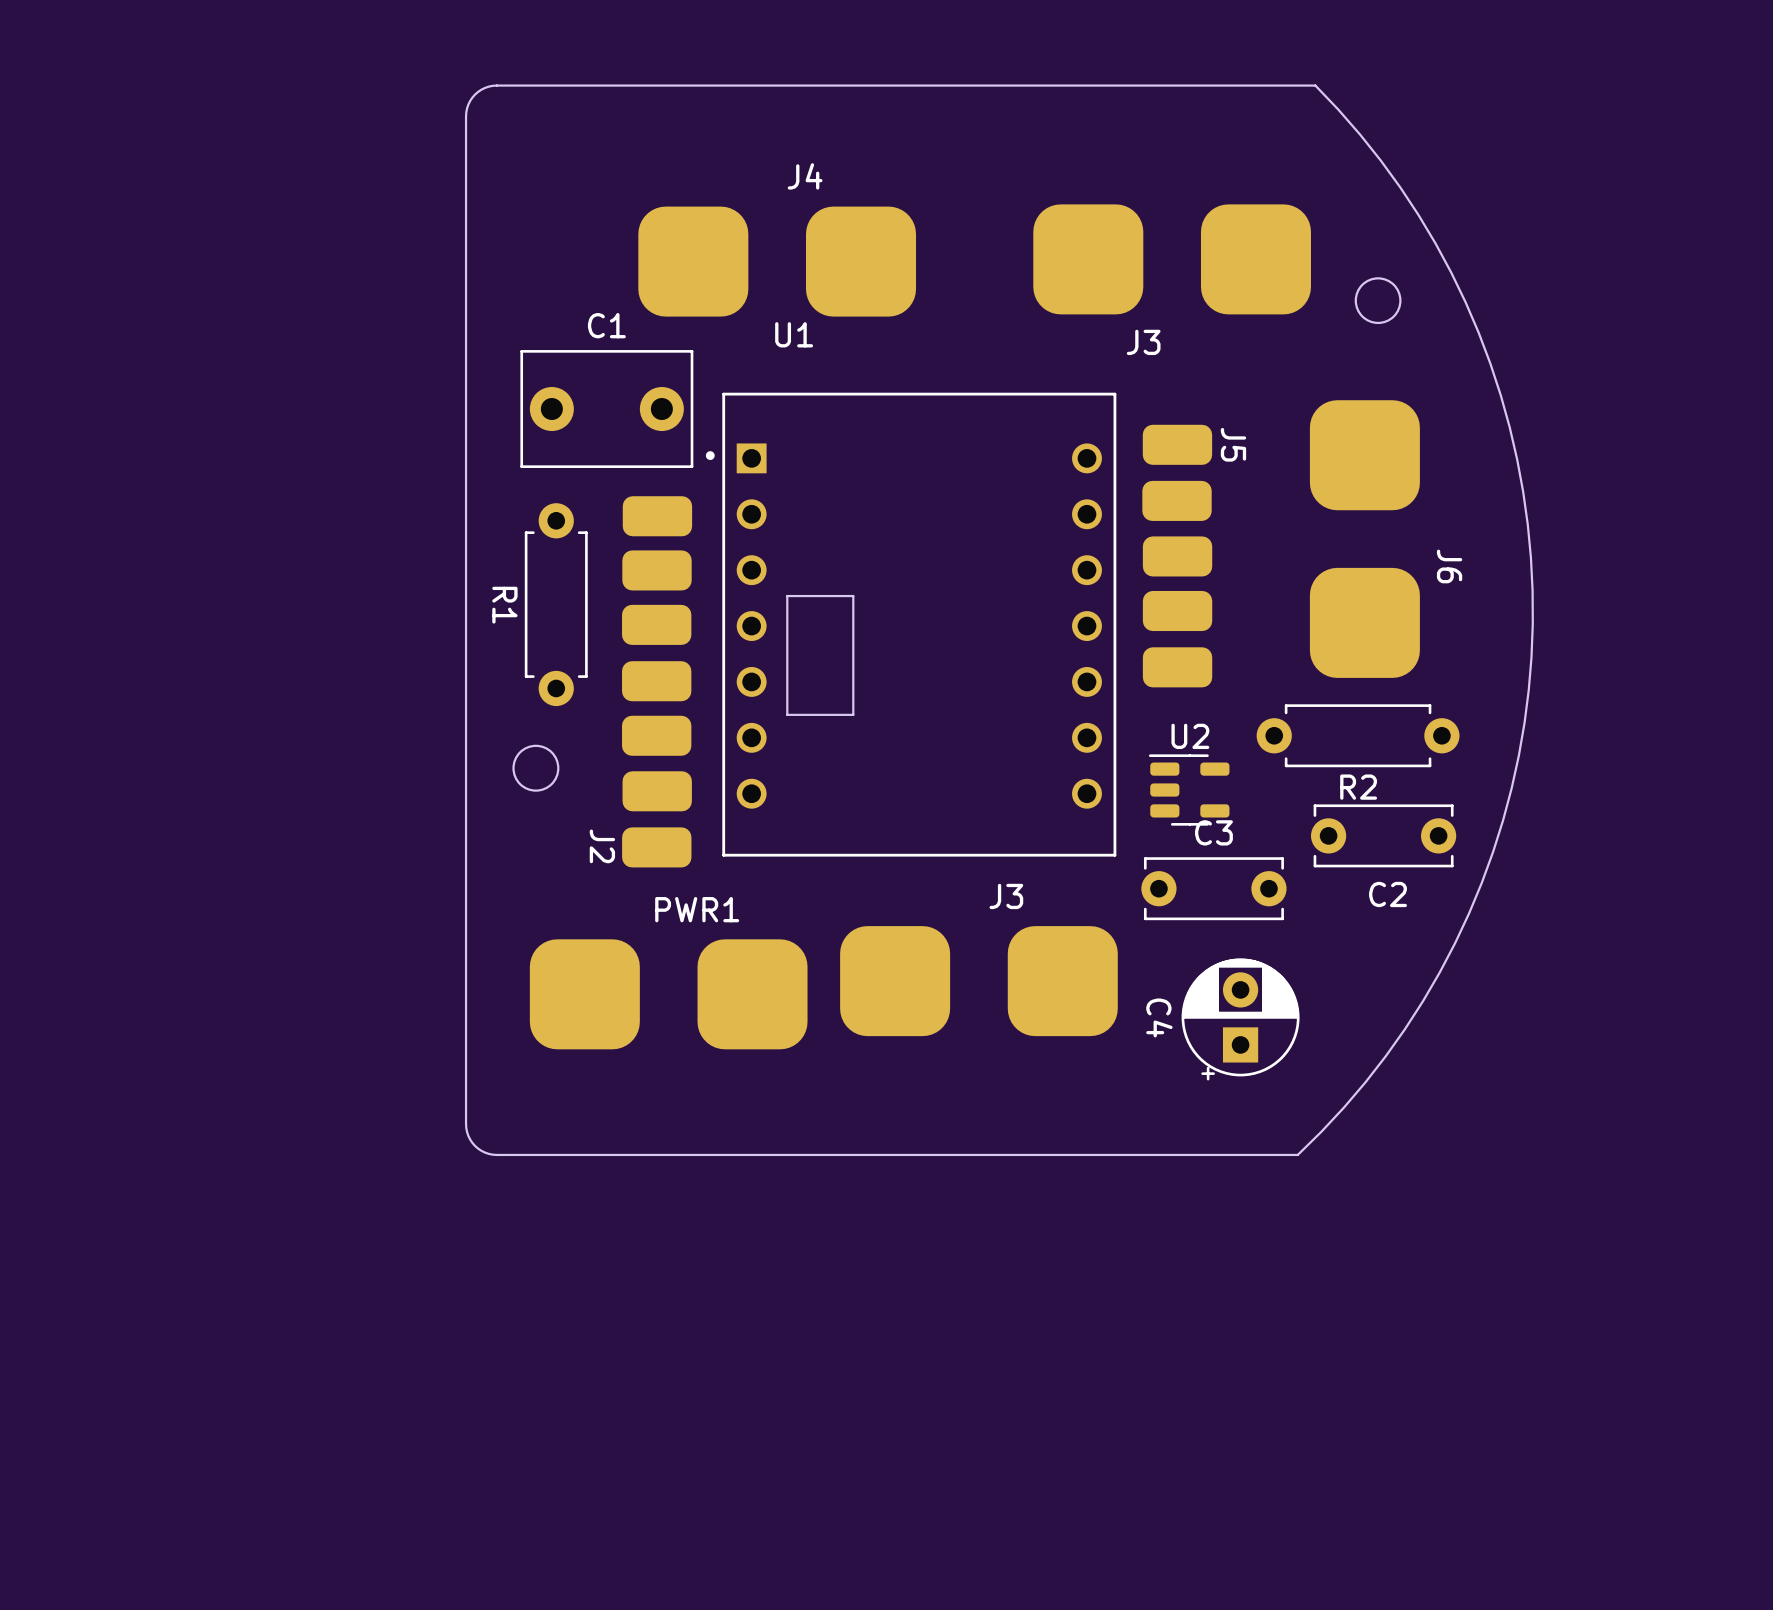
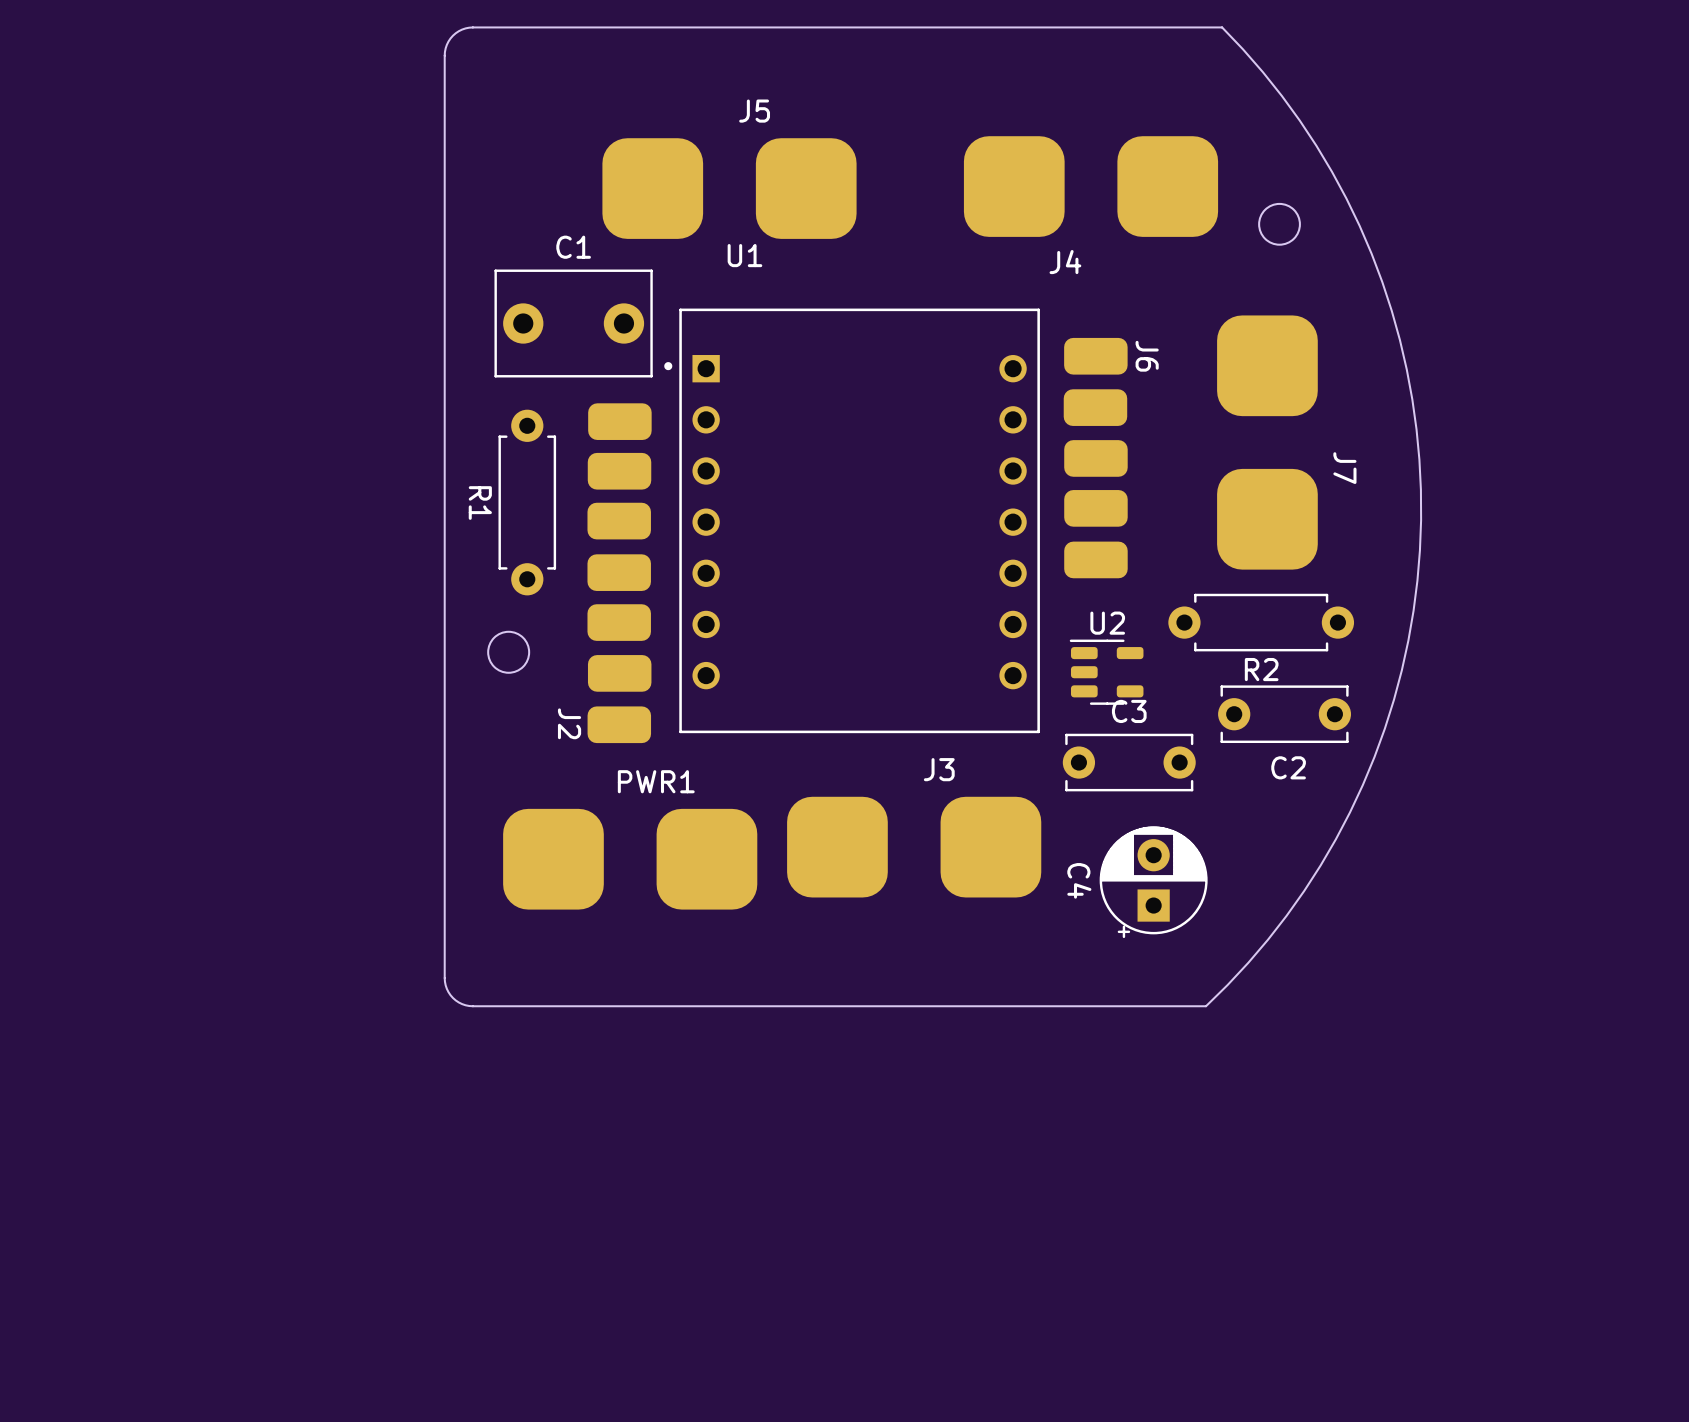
J4 name: J4 (805, 176) -> J5 (754, 111)
J3 name: J3 (1143, 342) -> J4 (1065, 262)
J5 name: J5 (1233, 444) -> J6 (1147, 356)
J6 name: J6 (1449, 566) -> J7 (1344, 468)
board edge: (853, 596) (787, 596) (787, 714) (853, 714) (853, 596) -> none

